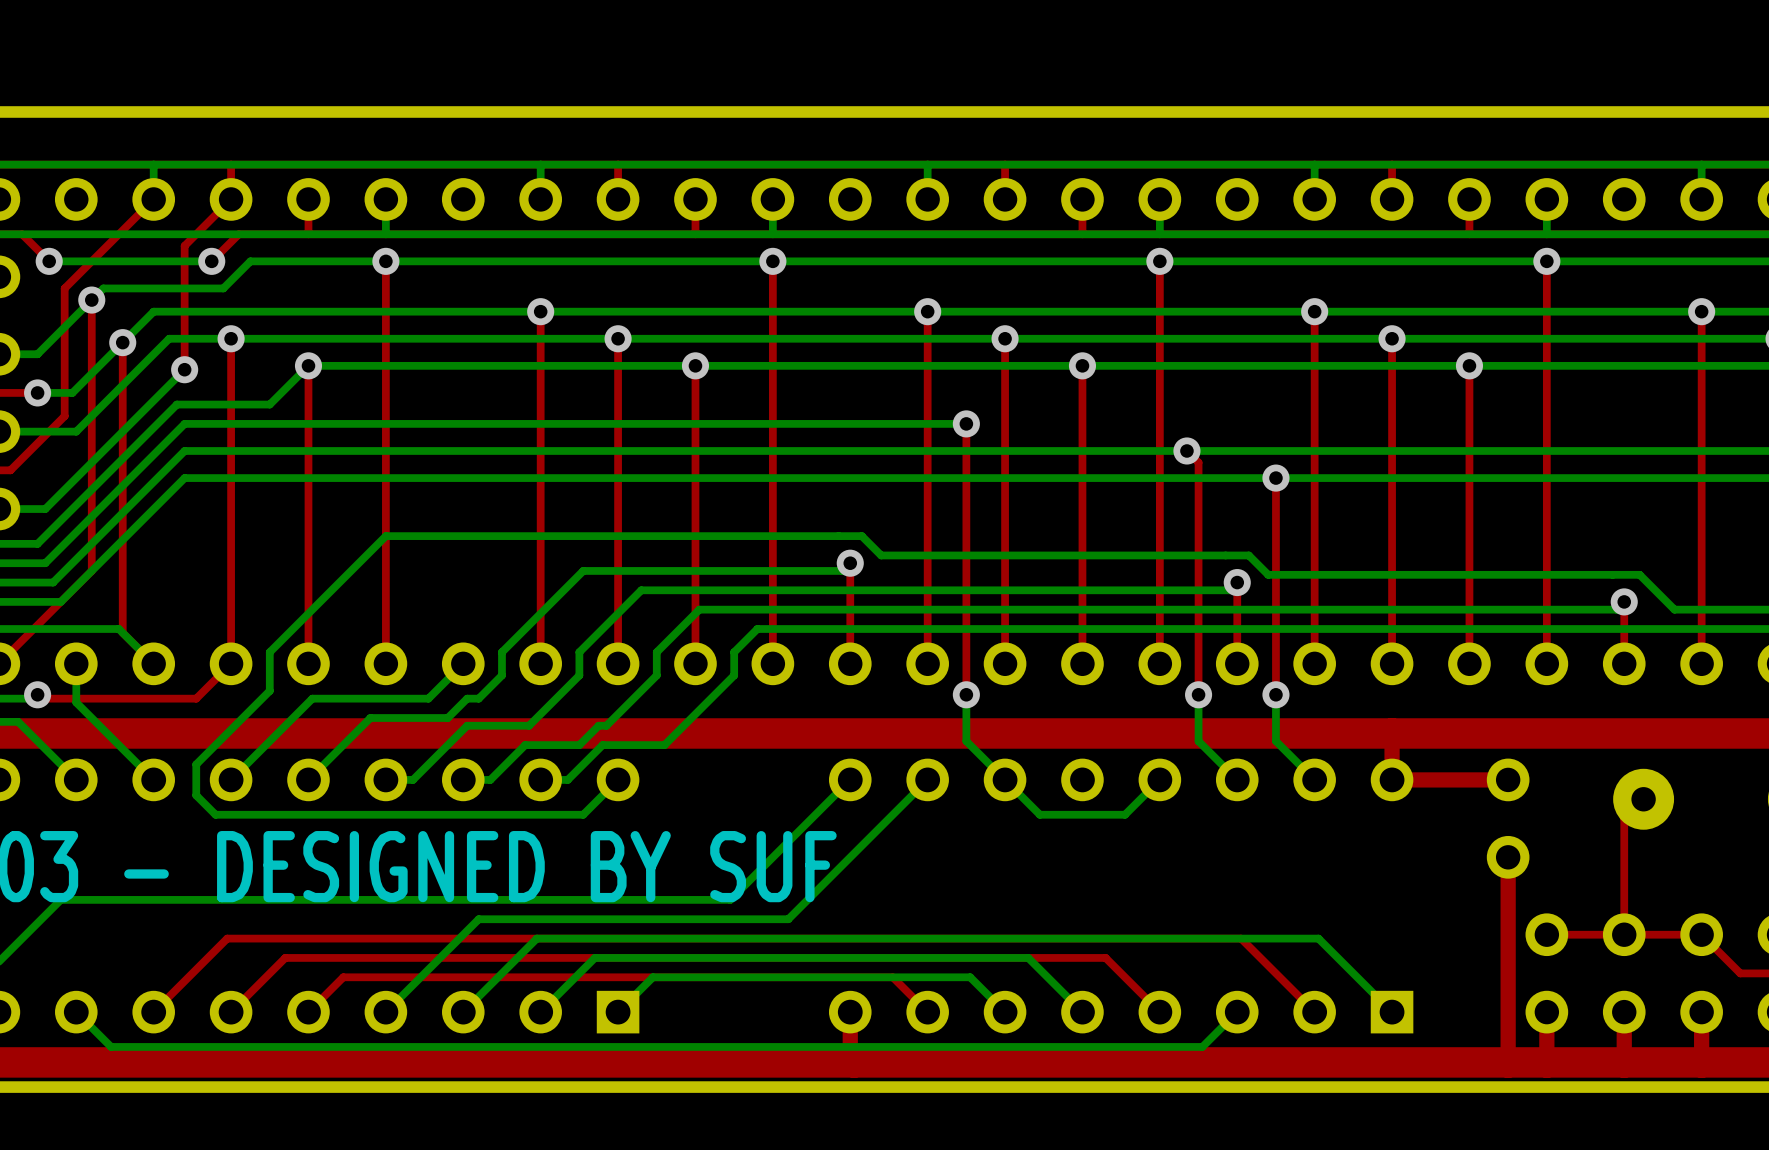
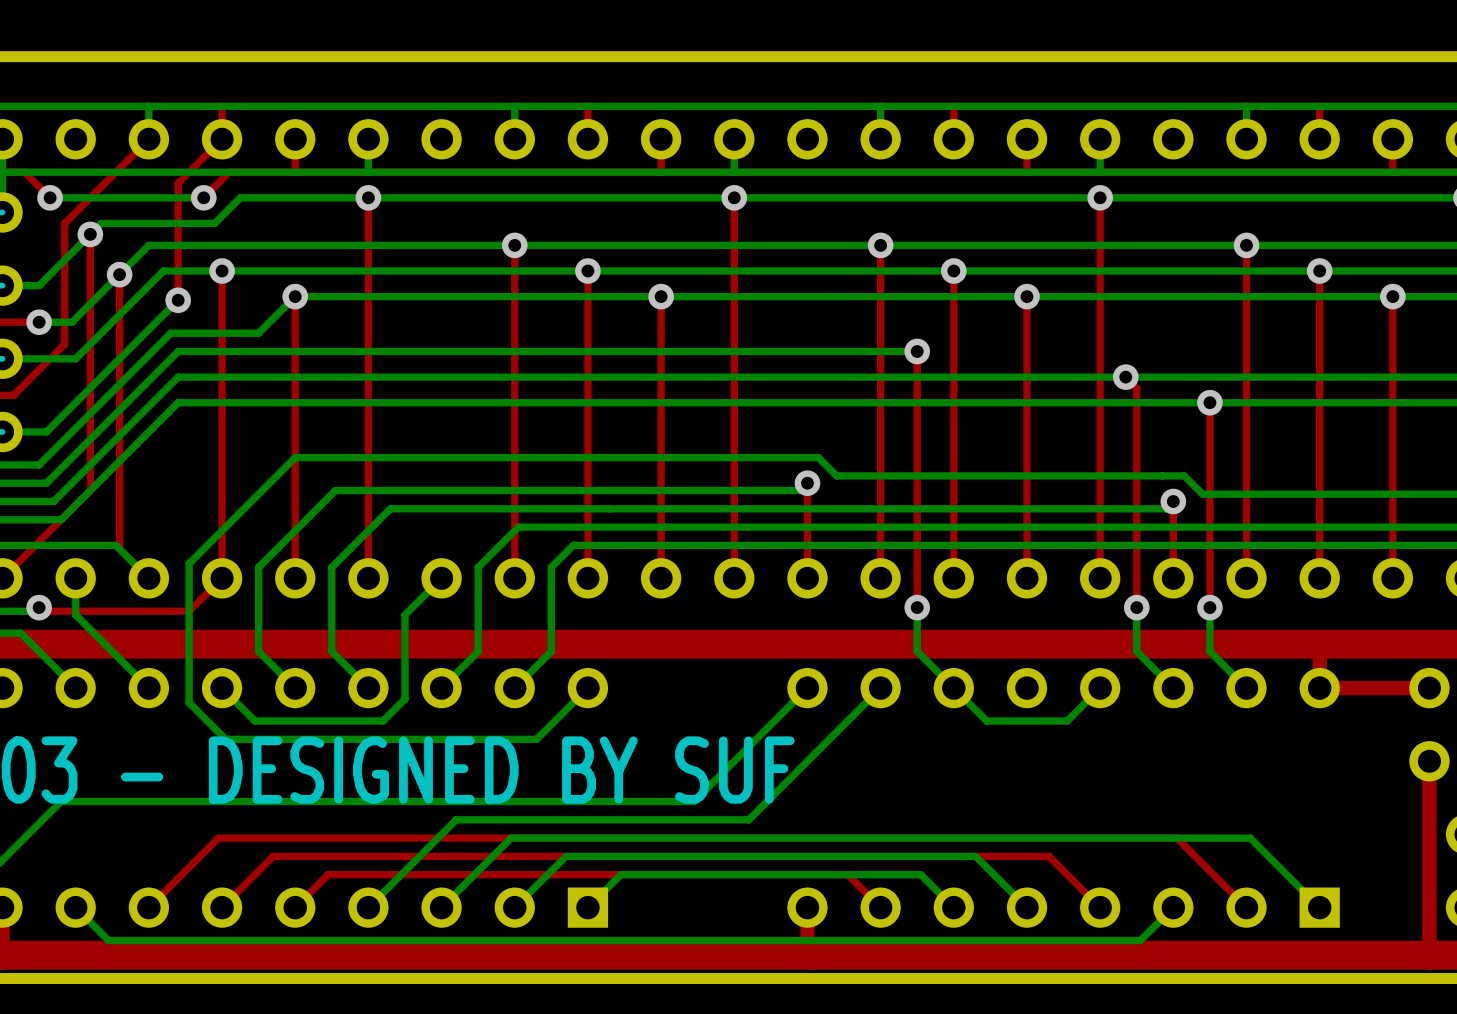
bottom track: (385, 536) (351, 570) -> (555, 490) (335, 490)
bottom track: none -> (368, 457) (295, 457) (189, 563) (189, 673)
bottom track: (583, 570) (544, 609) -> (664, 527) (518, 527)
bottom track: (641, 590) (602, 629) -> (719, 545) (573, 545)
bottom track: (699, 609) (656, 652) (656, 675) (606, 725) (598, 725) (579, 745) (525, 745) (490, 779) (463, 779) -> none
bottom track: (757, 629) (734, 652) (734, 675) (664, 745) (602, 745) (567, 779) (540, 779) -> (551, 589) (551, 651) (514, 688)
bottom track: (501, 675) (478, 698) (467, 698) (447, 718) (370, 718) (308, 779) -> (478, 589) (478, 651) (441, 688)
bottom track: (579, 675) (529, 725) (467, 725) (412, 779) (385, 779) -> (609, 508) (390, 508) (331, 567) (331, 651) (368, 688)
bottom track: (269, 690) (196, 764) -> (258, 603) (258, 651) (295, 688)
bottom track: (428, 698) (312, 698) (231, 779) -> (408, 611) (405, 614) (405, 699) (383, 721)
bottom track: (265, 814) (215, 814) -> (255, 721) (222, 688)
bottom track: (583, 814) (401, 814) -> (555, 721) (536, 739) (225, 739) (207, 721)

